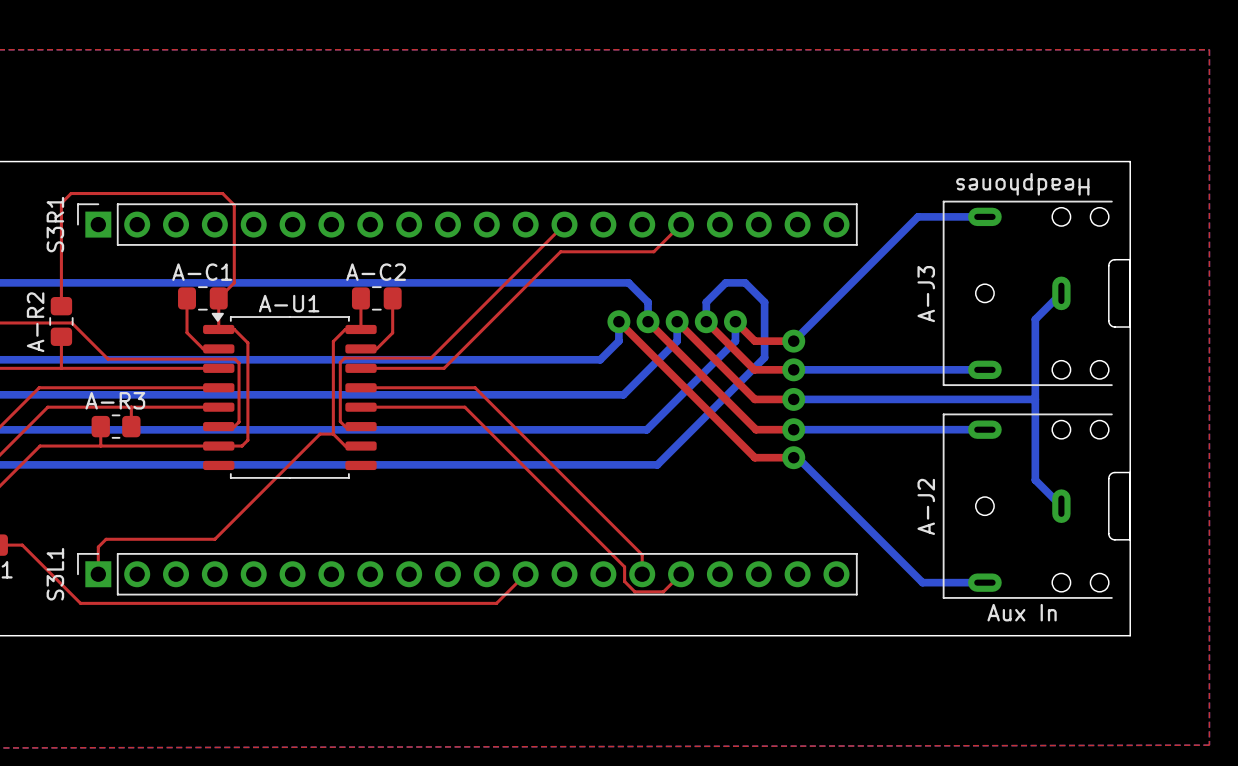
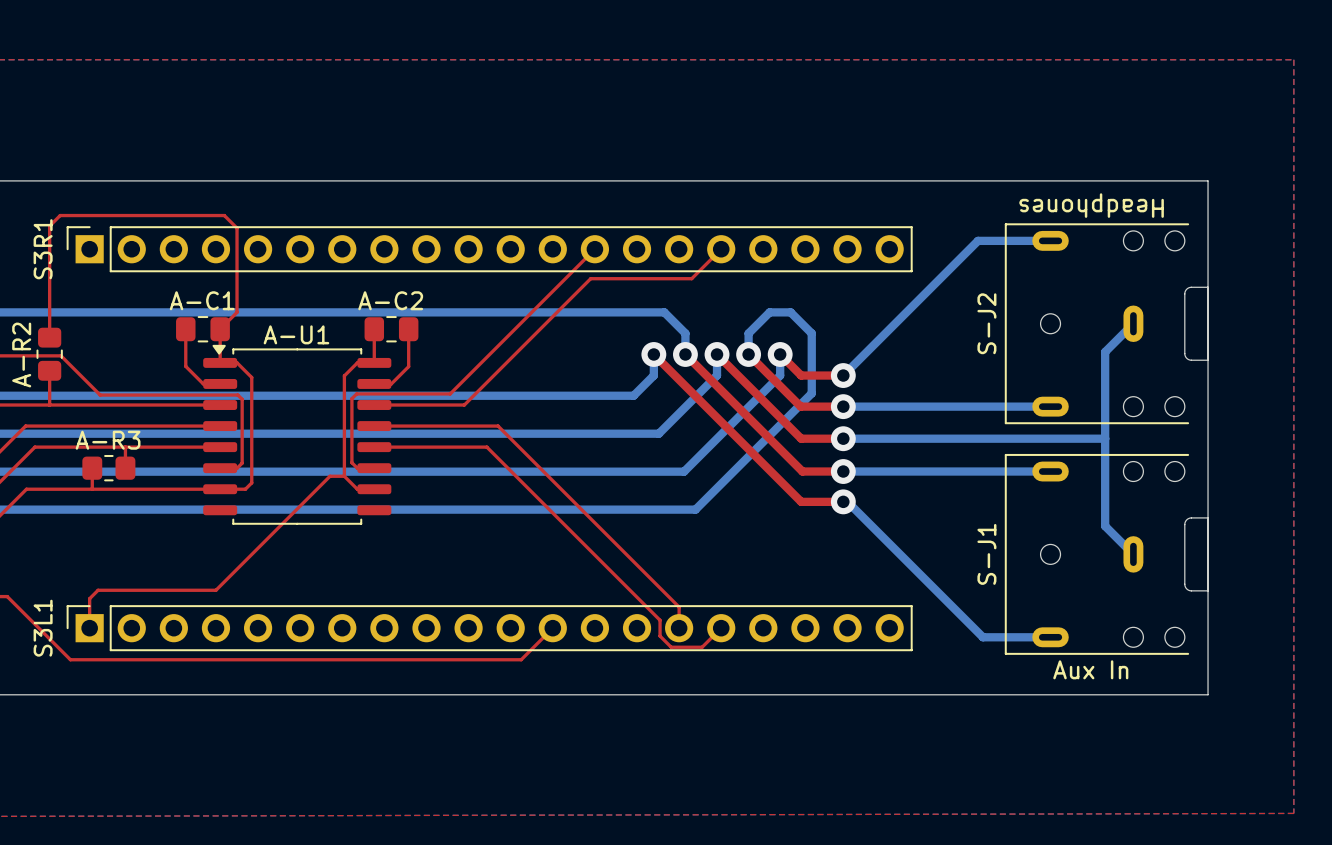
A-J3 name: A-J3 (926, 294) -> S-J2 (986, 323)
A-J2 name: A-J2 (926, 506) -> S-J1 (986, 554)

